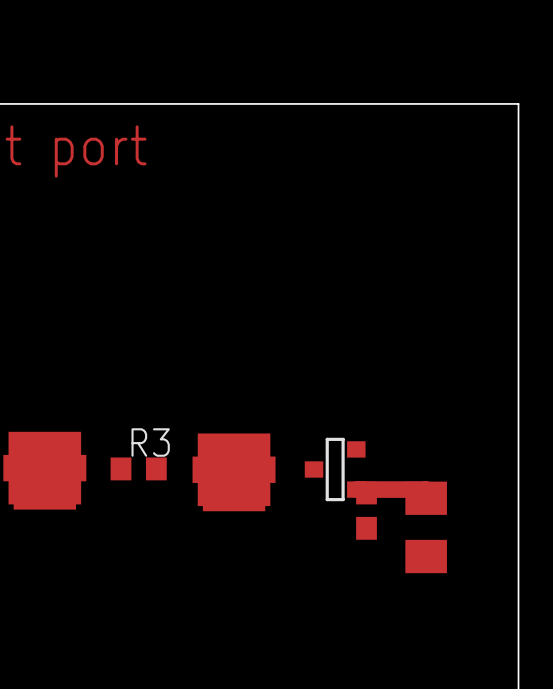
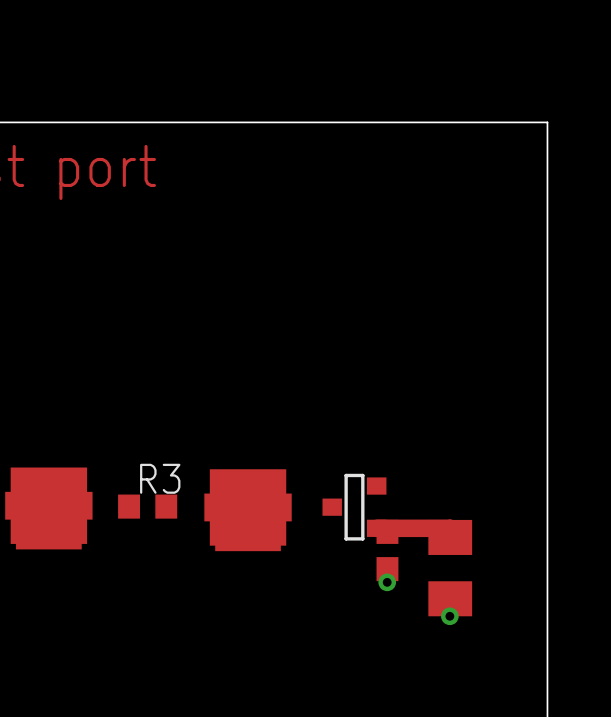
via: none -> (387, 582)
via: none -> (449, 616)

